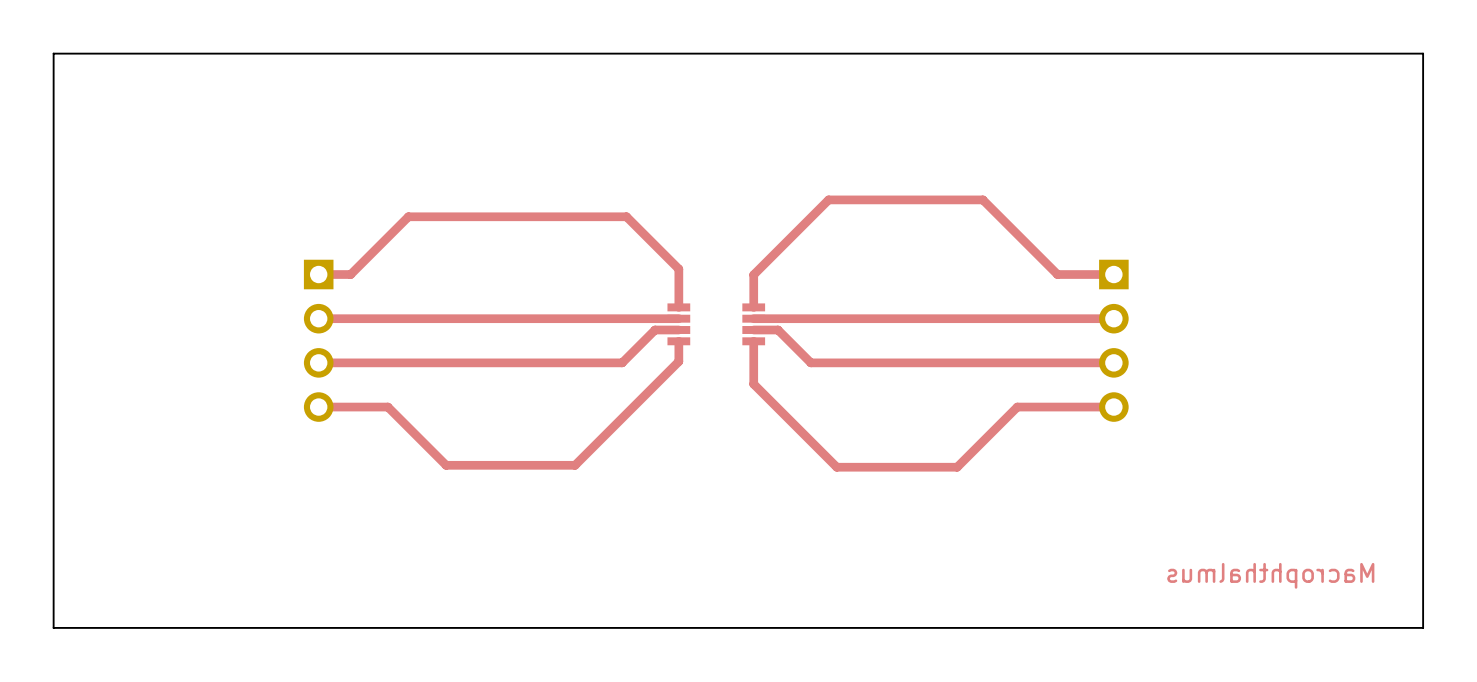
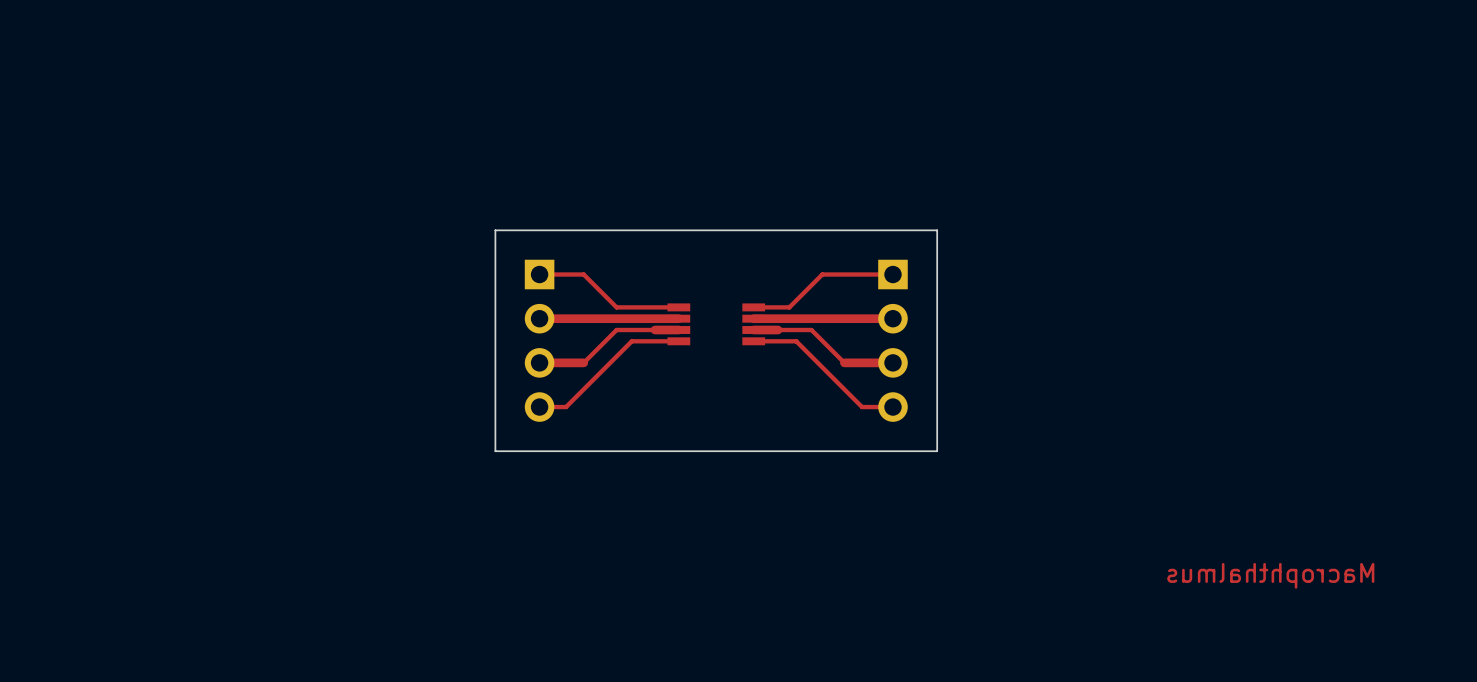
board edge: (1423, 53) (53, 53) (53, 627) (1423, 627) (1423, 53) -> none
board edge: none -> (937, 230) (495, 230) (495, 451) (937, 451) (937, 230)
top track: (318, 274) (350, 274) (408, 216) (626, 216) (678, 269) (678, 307) -> (539, 274) (583, 274) (616, 307) (678, 307)
top track: (1113, 274) (1057, 274) (982, 199) (828, 199) (753, 274) (753, 307) -> (892, 274) (822, 274) (789, 307) (753, 307)
top track: (539, 318) (318, 318) -> none
top track: (1113, 318) (892, 318) -> none
top track: (655, 330) (622, 362) (583, 362) -> (655, 330) (616, 330) (583, 362)
top track: (778, 330) (810, 362) (844, 362) -> (778, 330) (811, 330) (844, 362)
part position: (318, 340) -> (539, 340)
part position: (1113, 340) -> (892, 340)
top track: (678, 341) (678, 361) (575, 465) (446, 465) (387, 407) (318, 407) -> (678, 341) (631, 341) (566, 407) (539, 407)
top track: (753, 341) (753, 384) (836, 467) (957, 467) (1017, 407) (1113, 407) -> (753, 341) (796, 341) (862, 407) (892, 407)
top track: (539, 362) (318, 362) -> none
top track: (1113, 362) (892, 362) -> none

